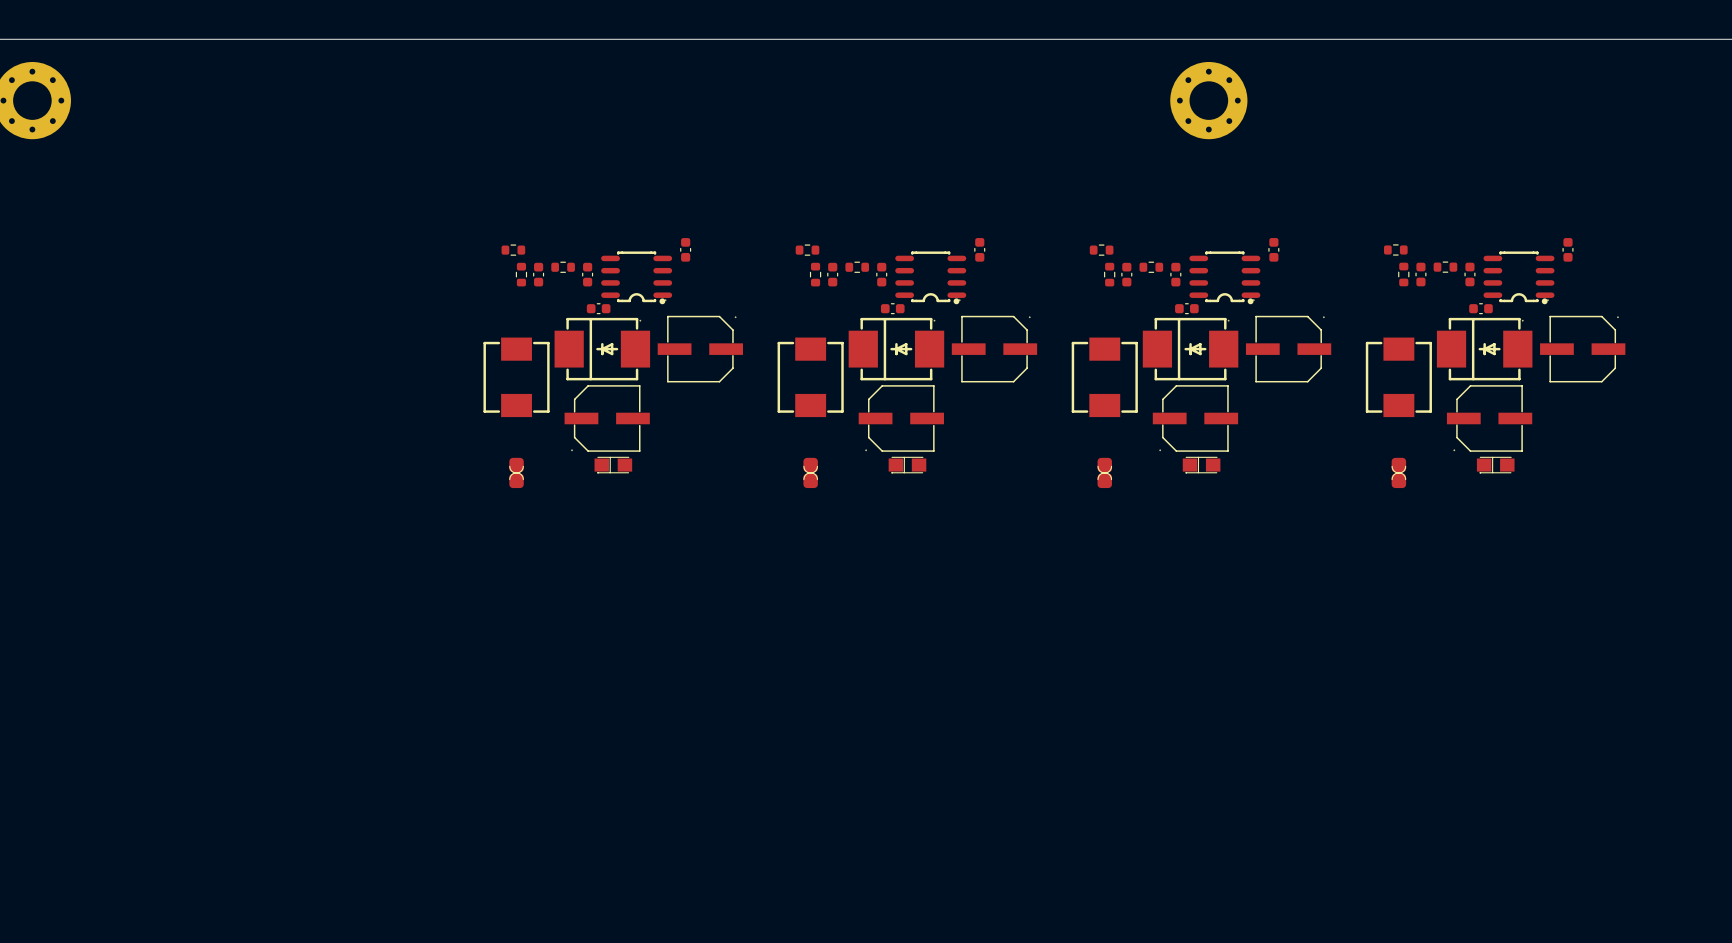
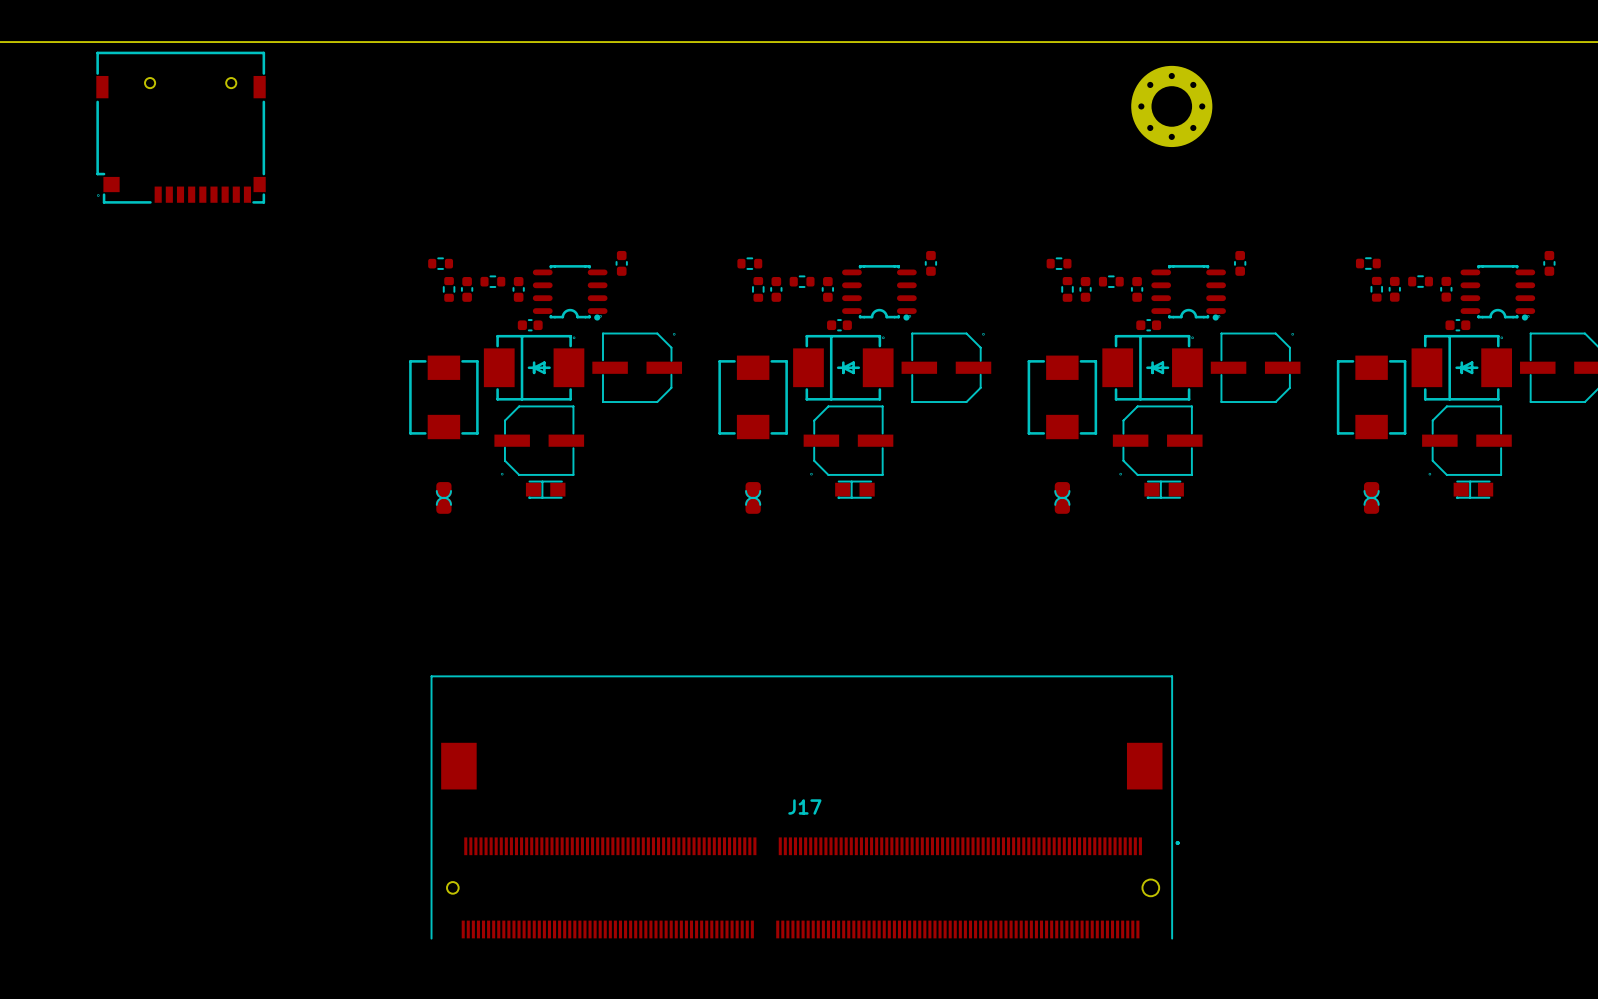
part: none -> (181, 127)
J17: none -> (805, 807)

